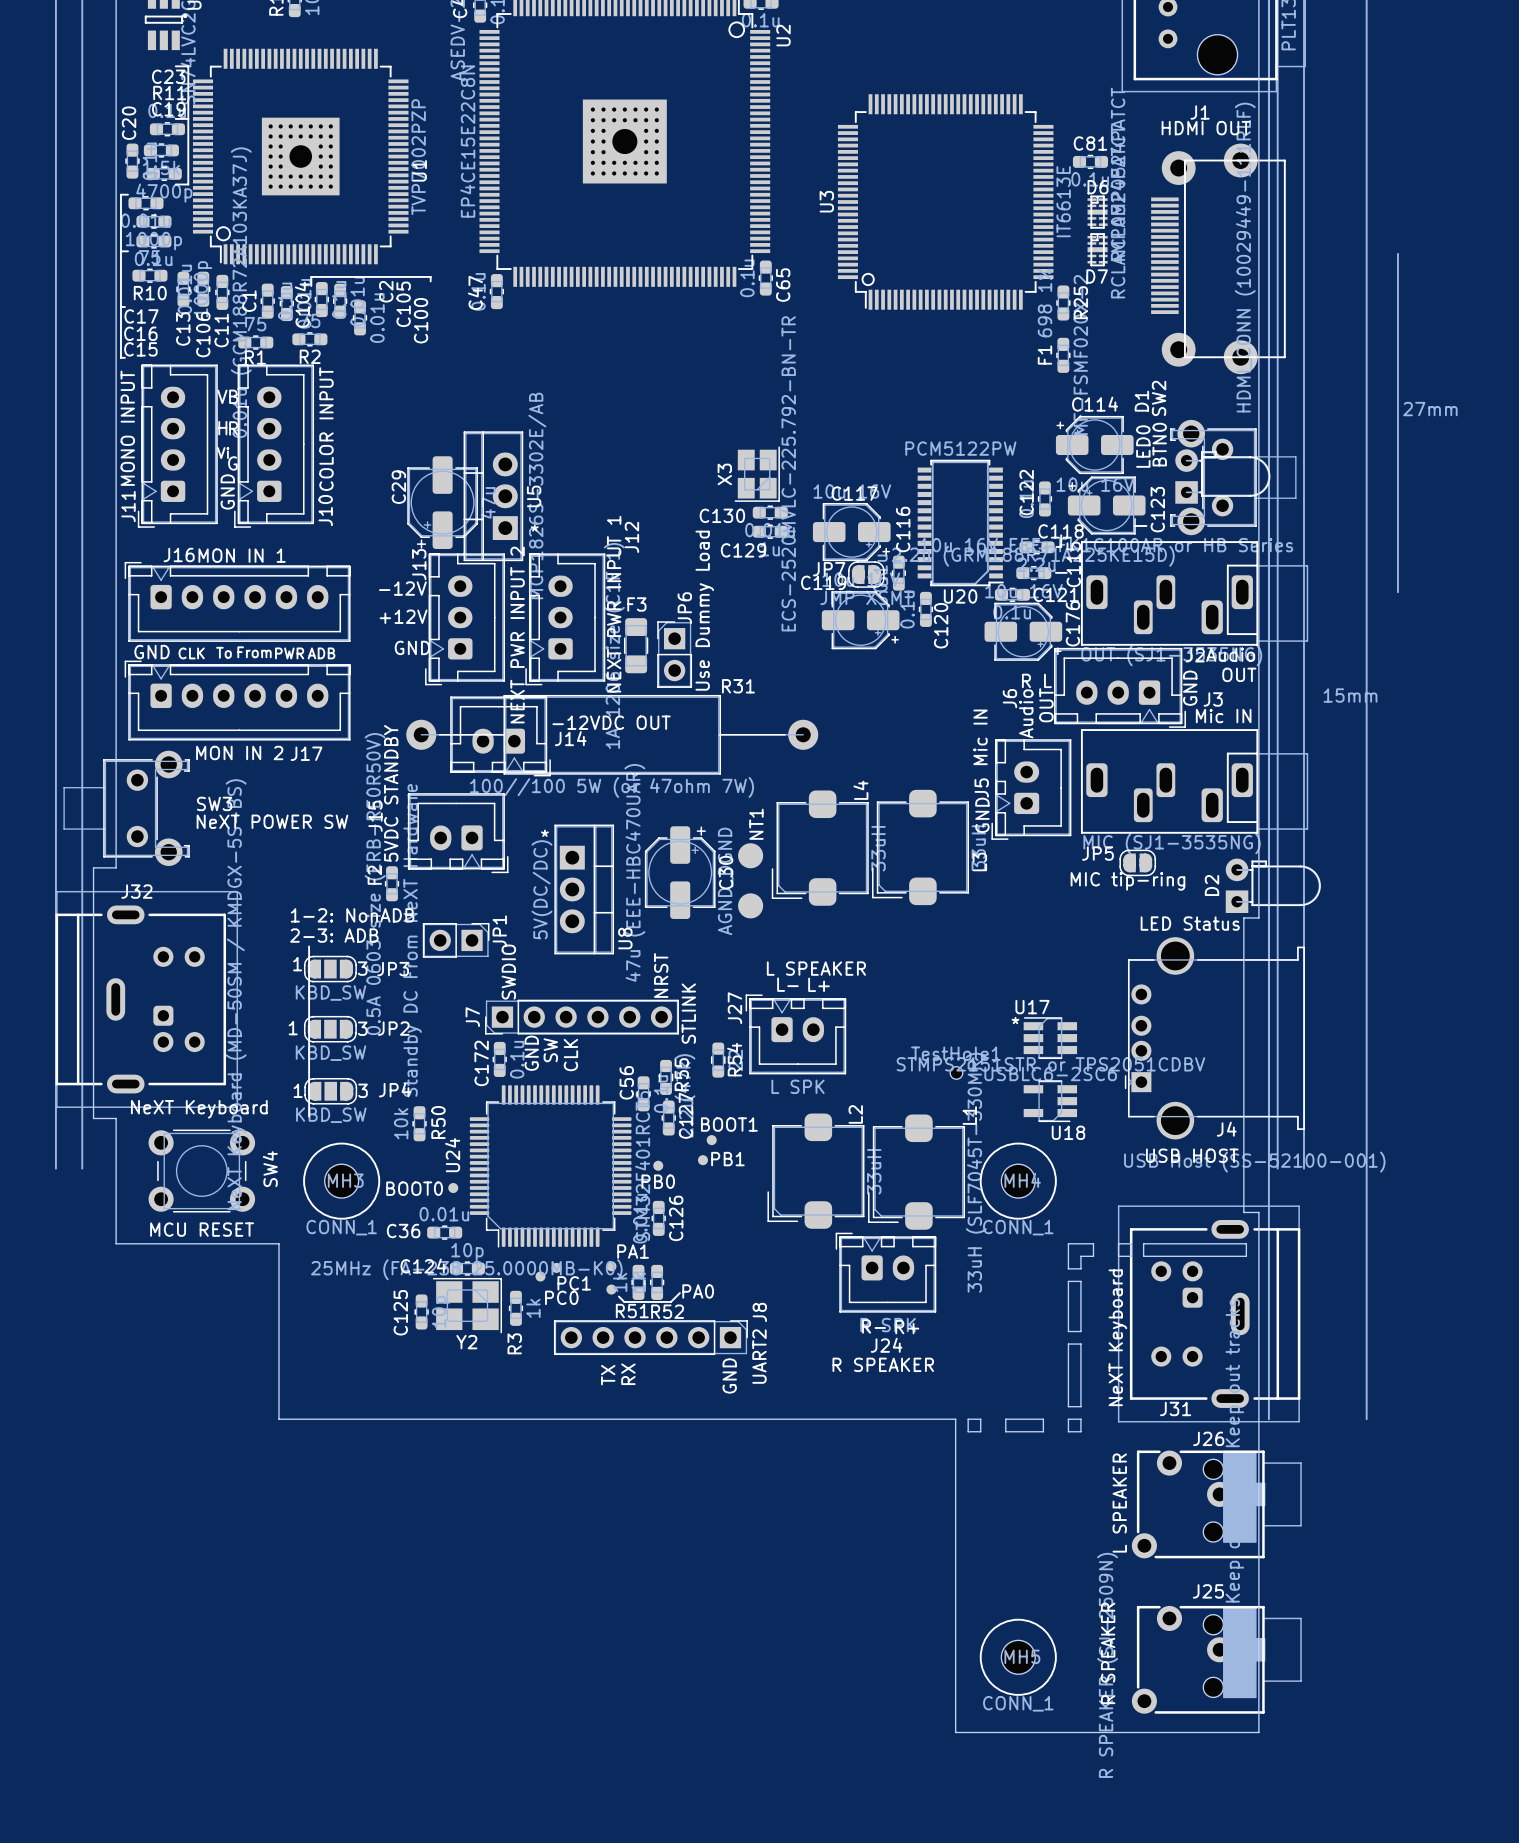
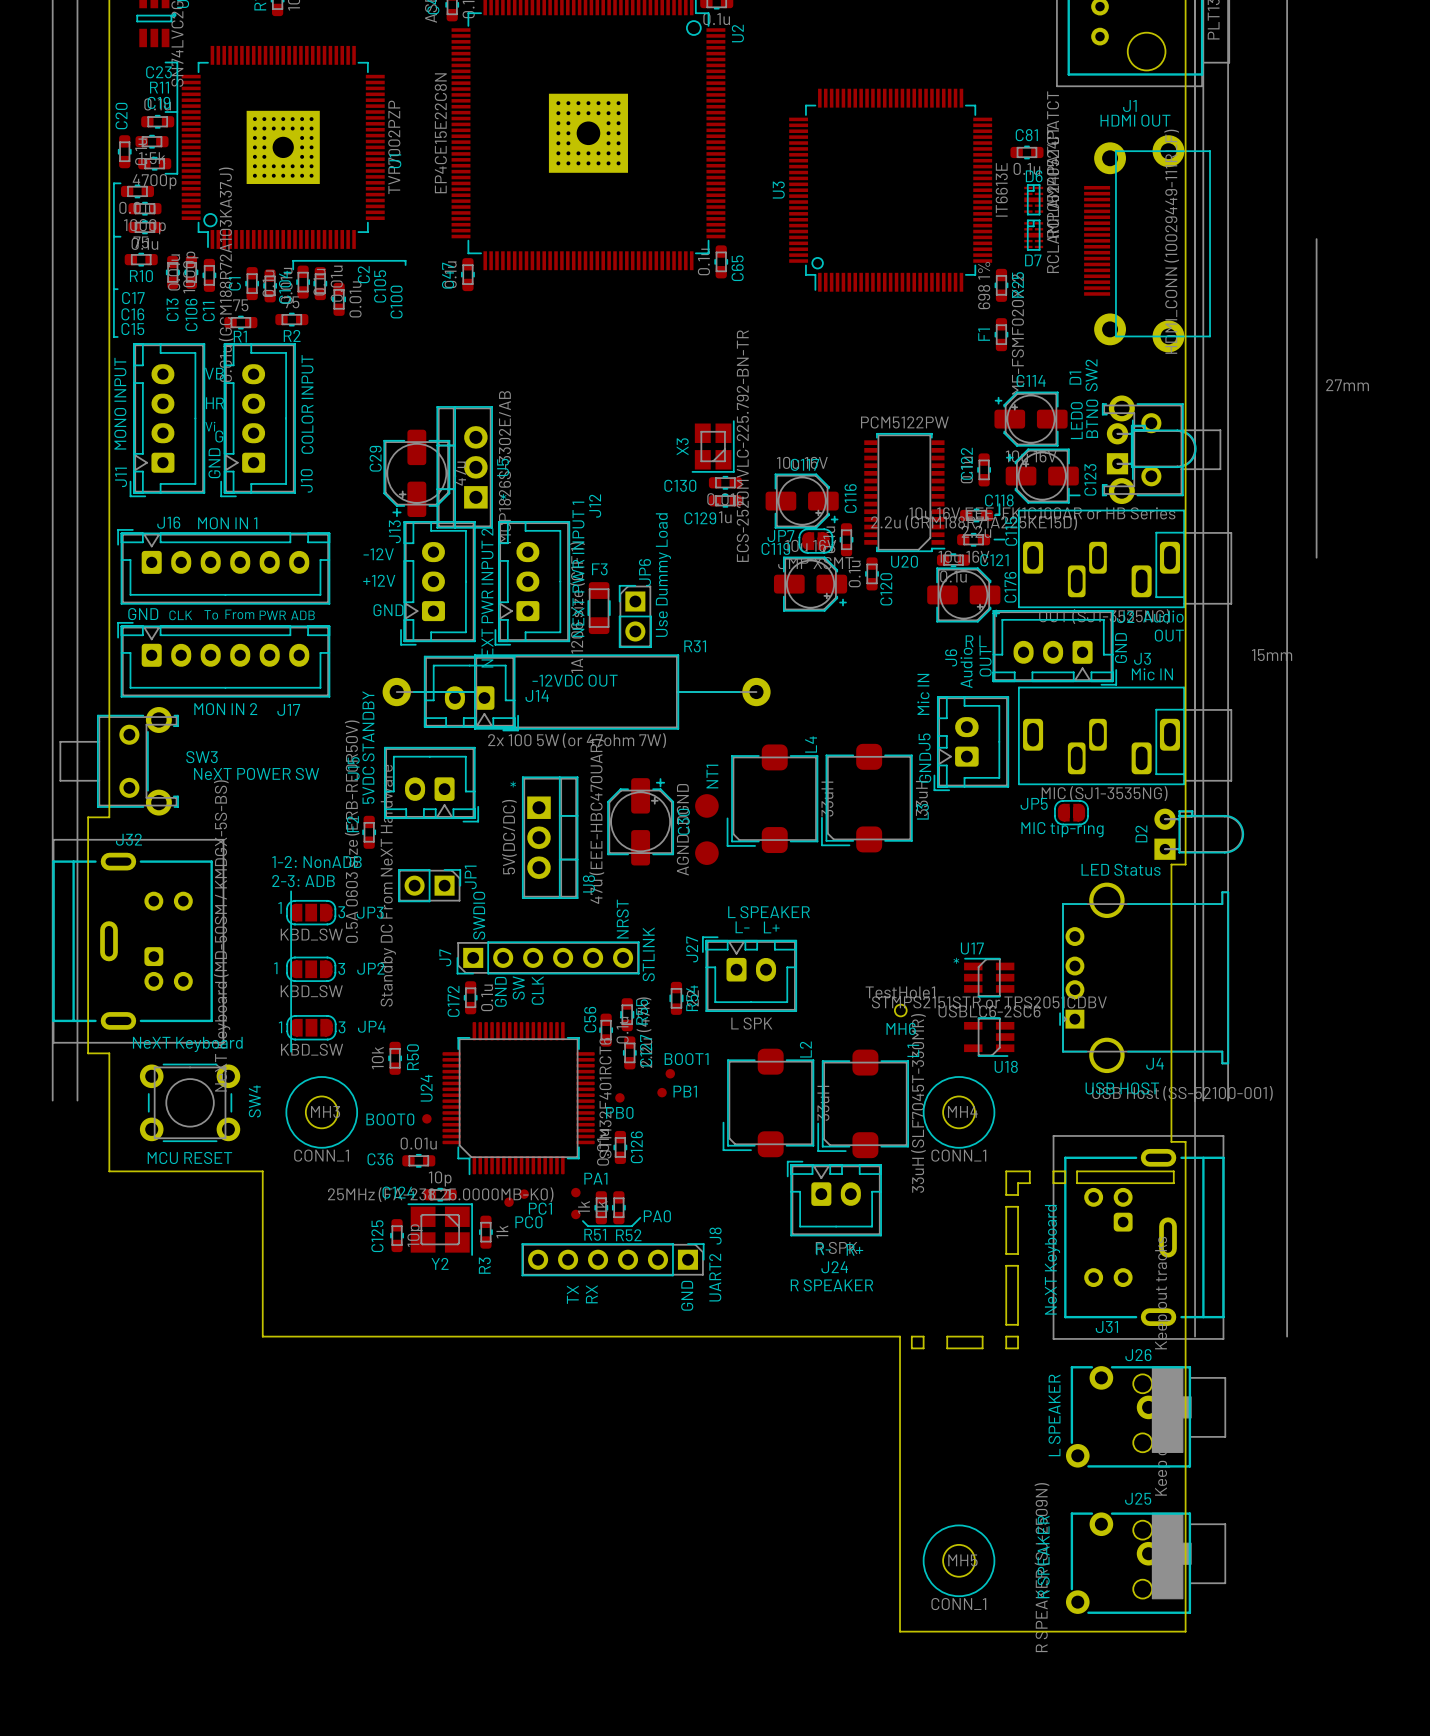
R31 value: 100//100 5W (or 47ohm 7W) (611, 787) -> 2x 100 5W (or 47ohm 7W) (577, 740)
MH6 name: none -> MH6 (901, 1028)

